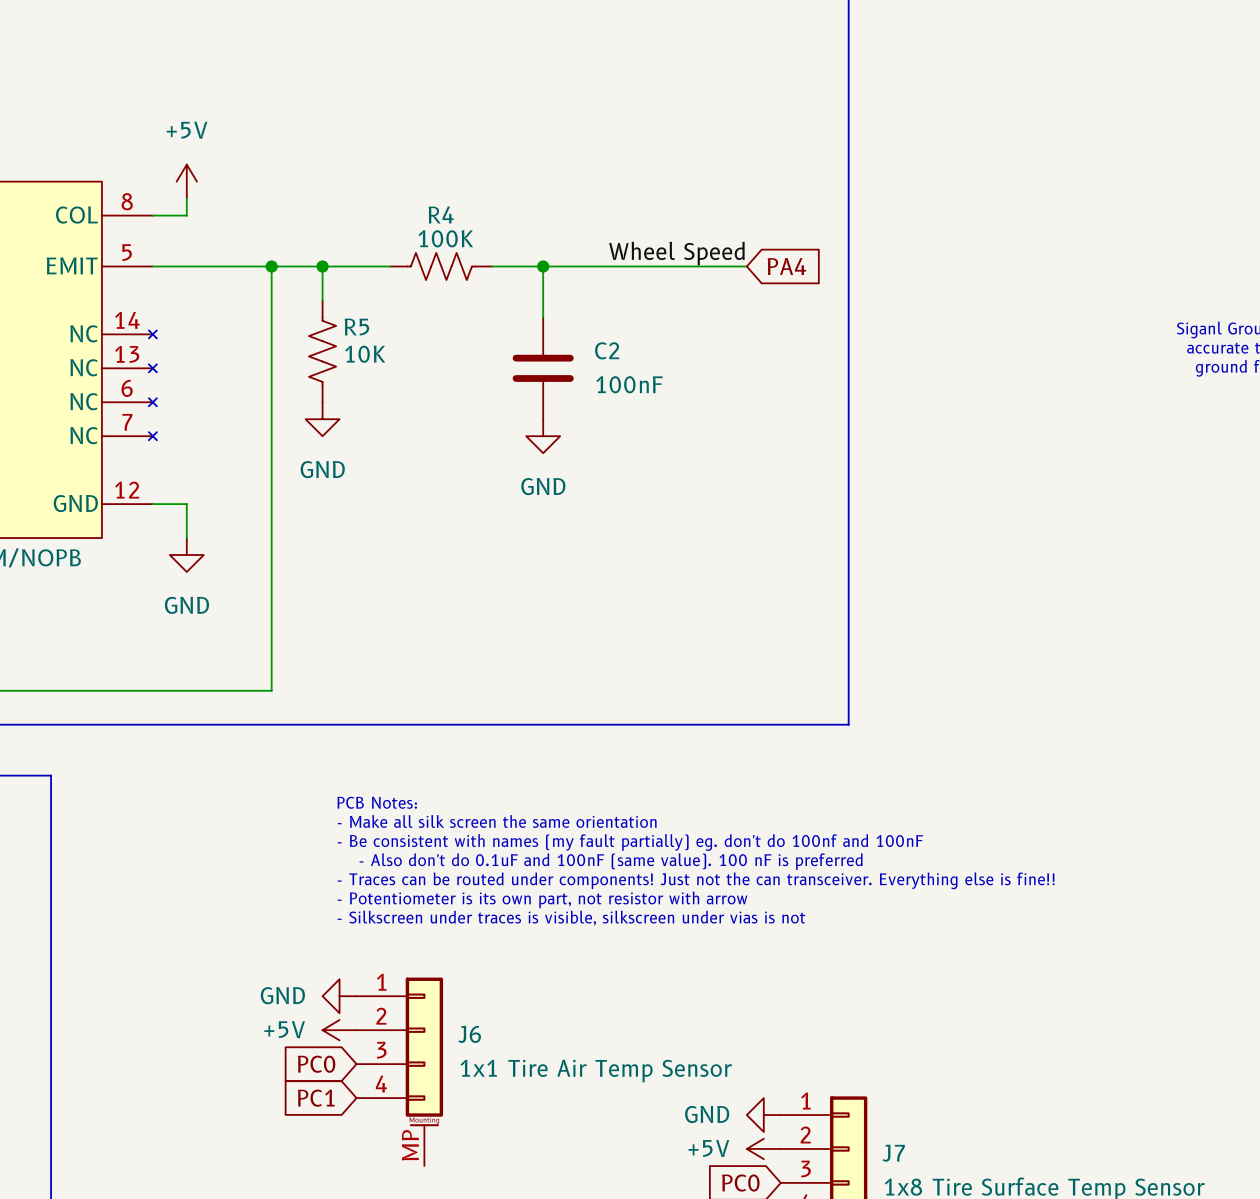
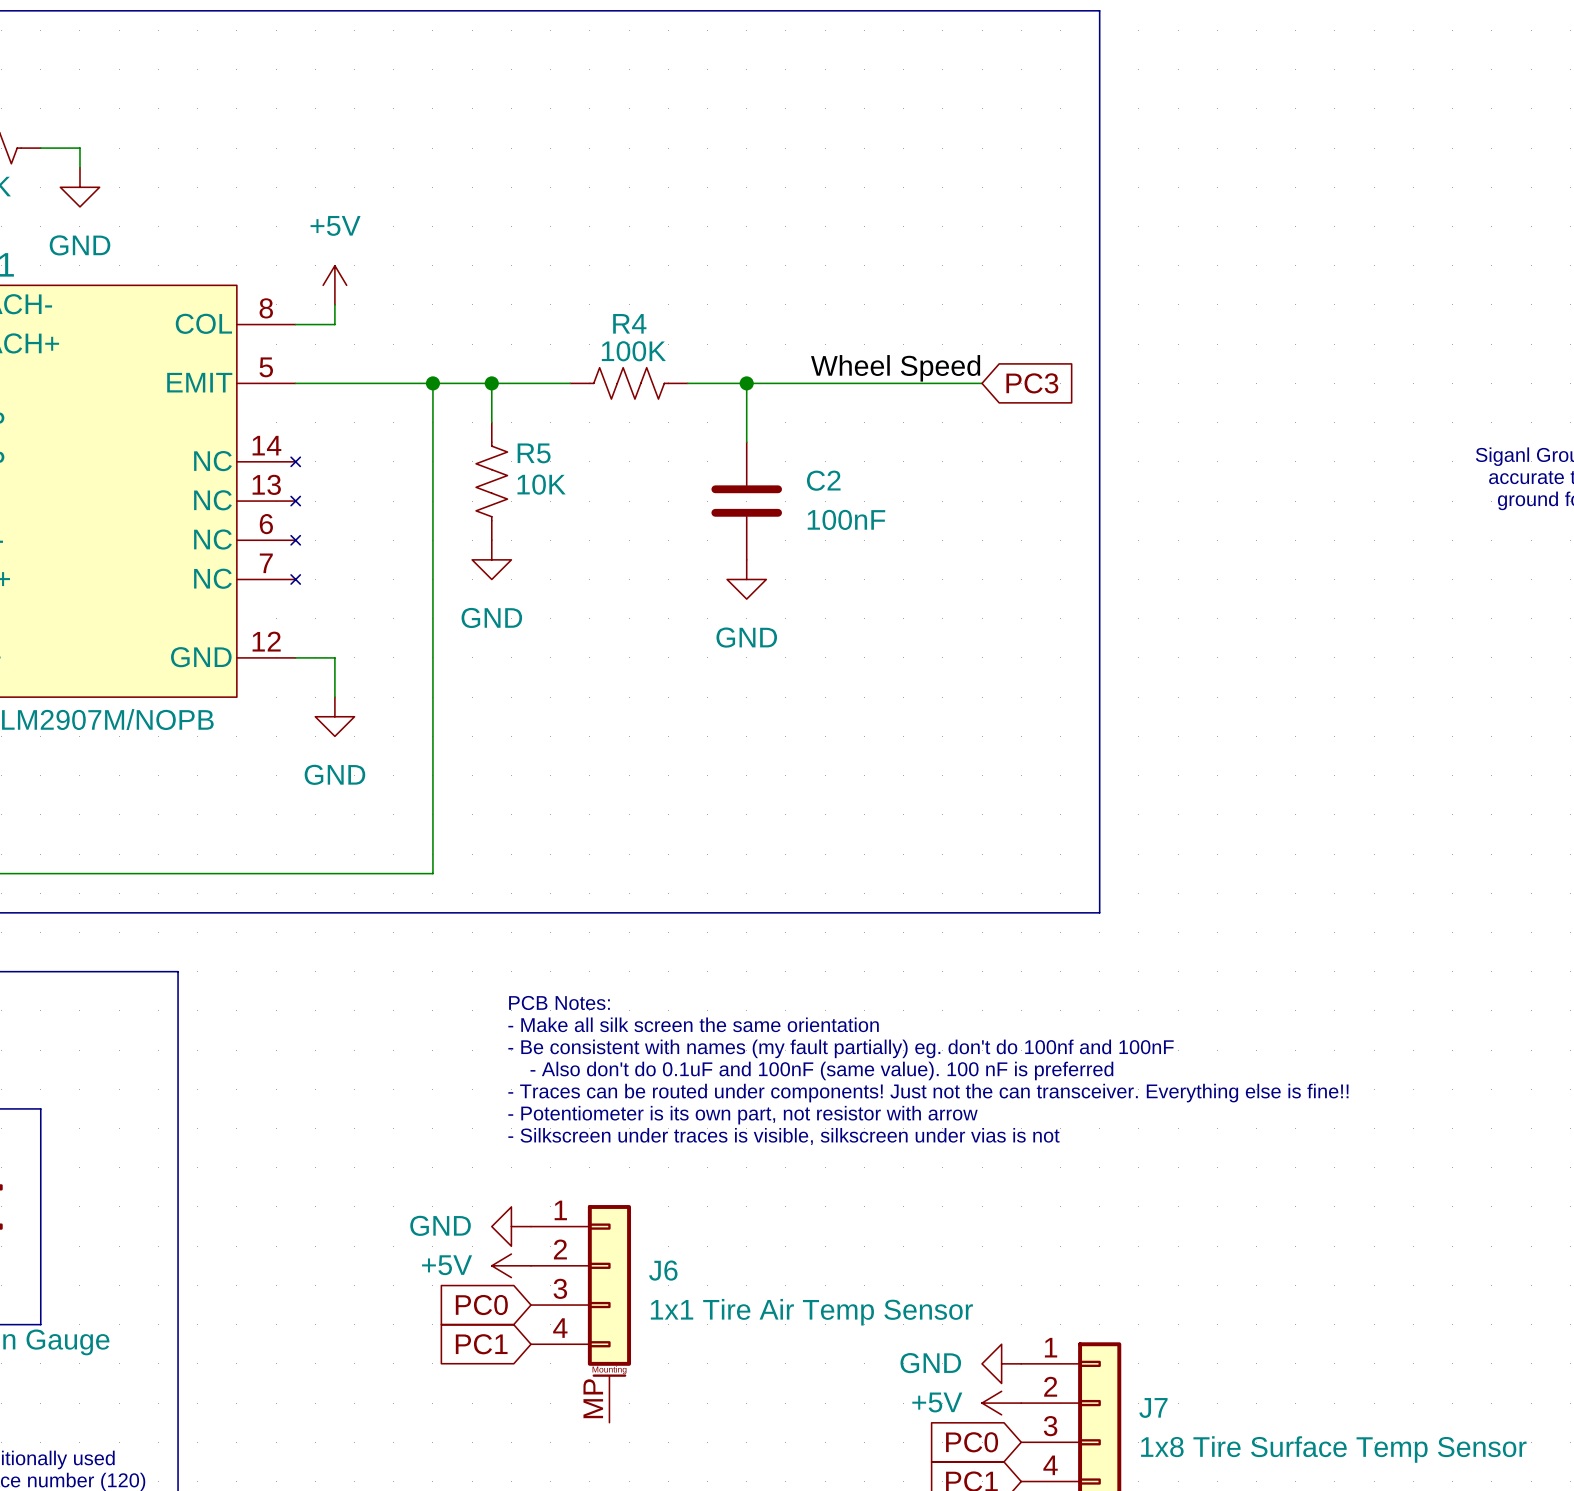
global label: PA4 (786, 266) -> PC3 (1032, 383)

